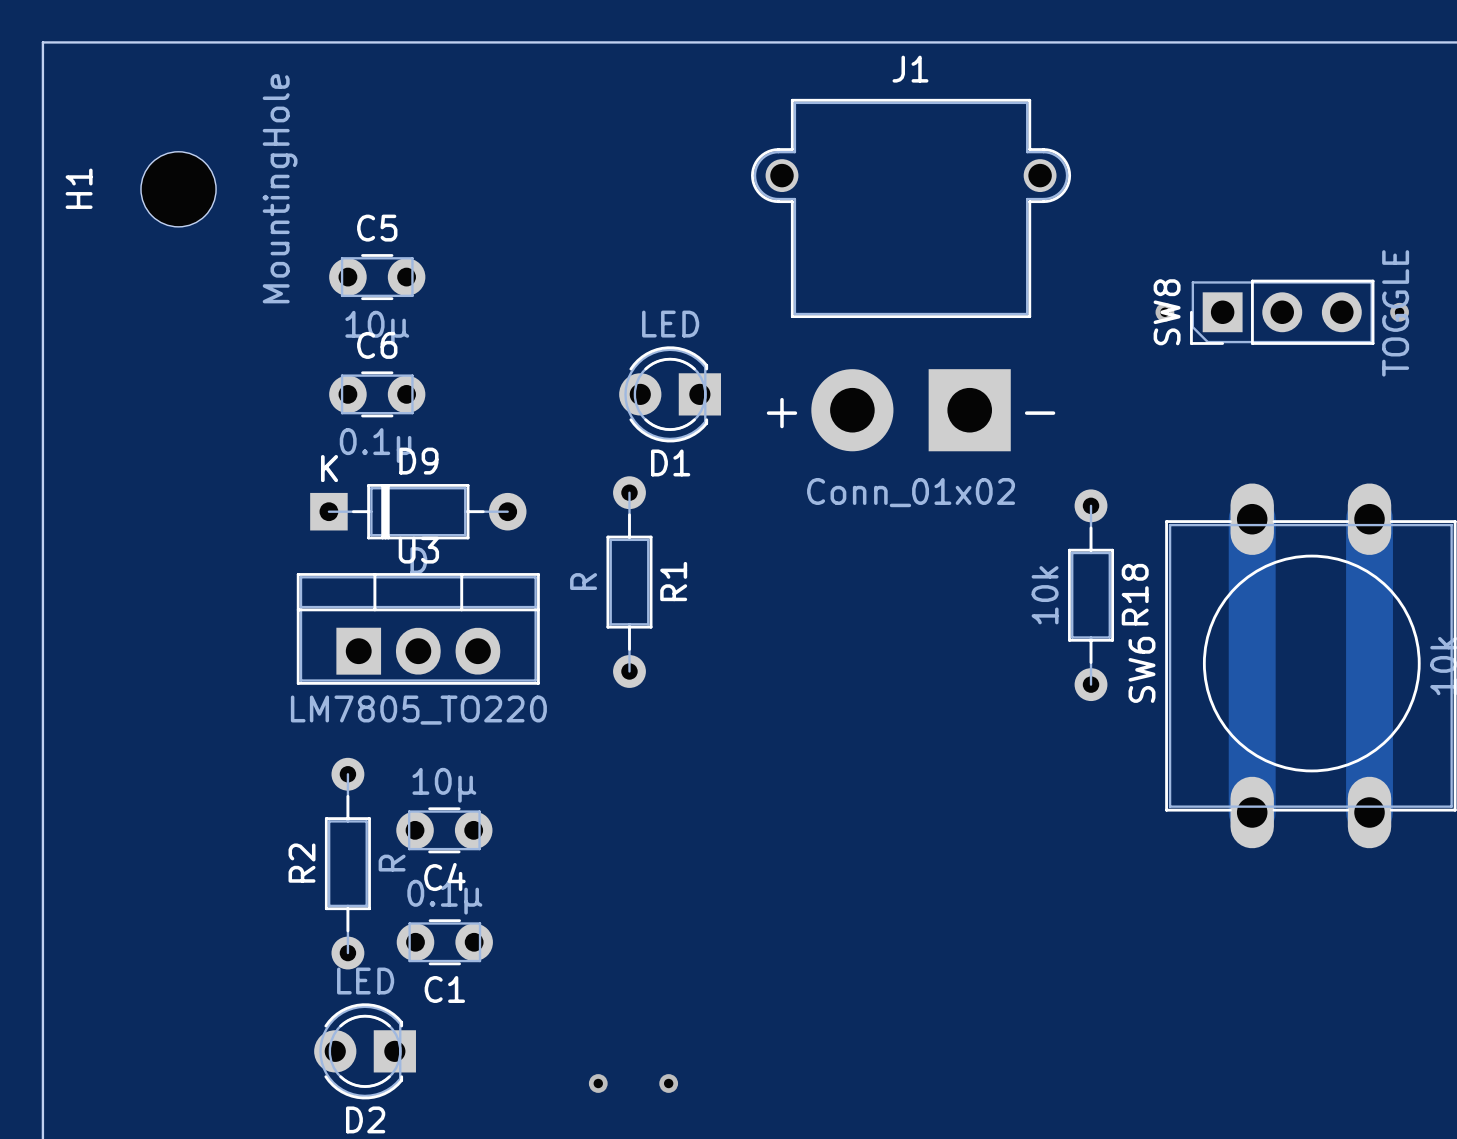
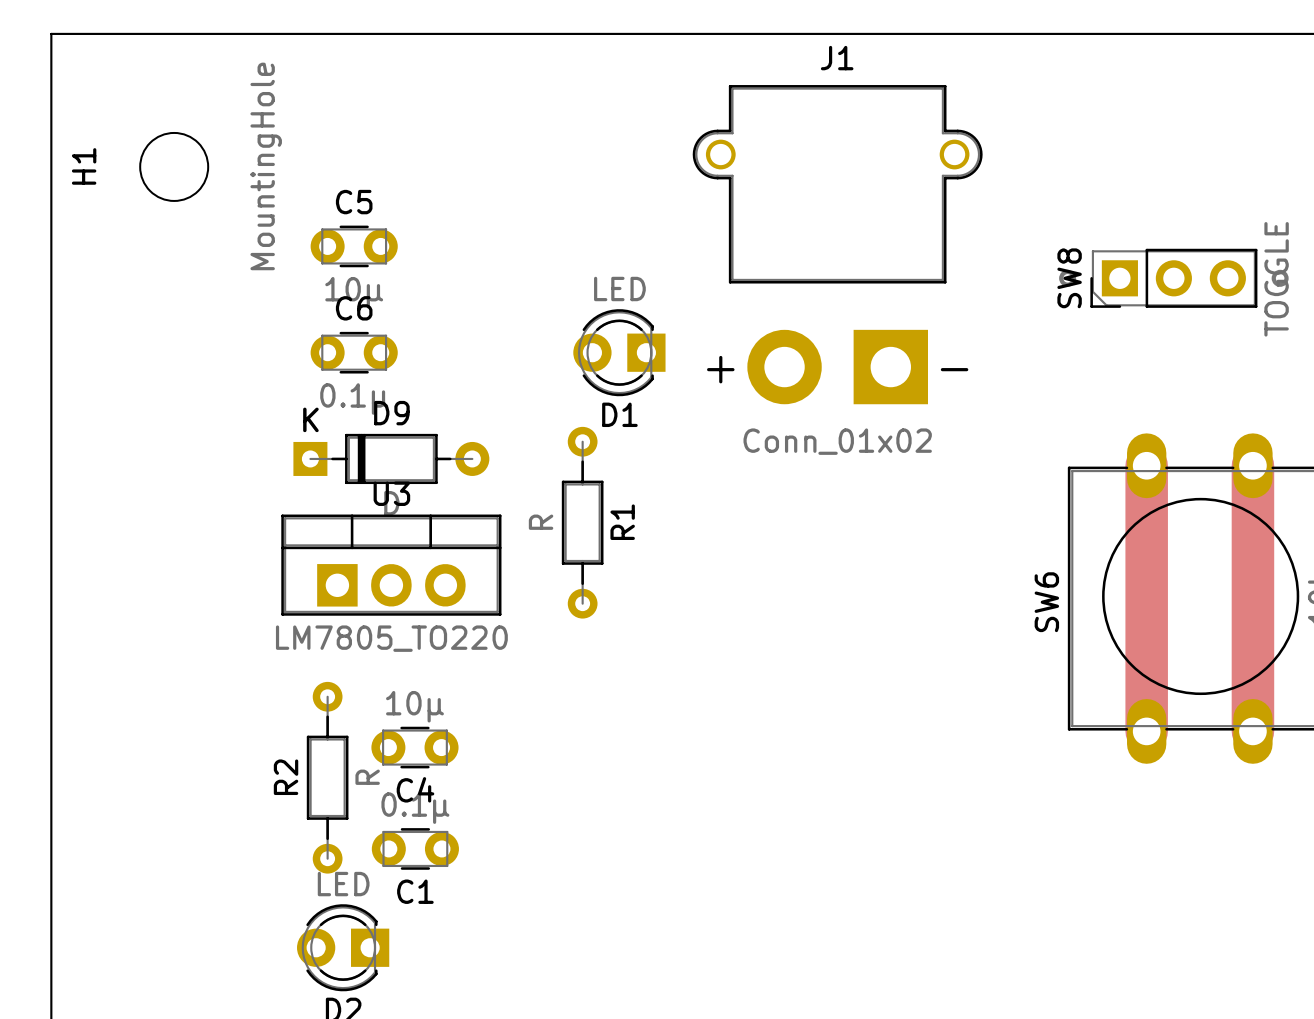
R18: 10k (1091, 595) -> none
via: (598, 1083) -> none
via: (668, 1083) -> none

